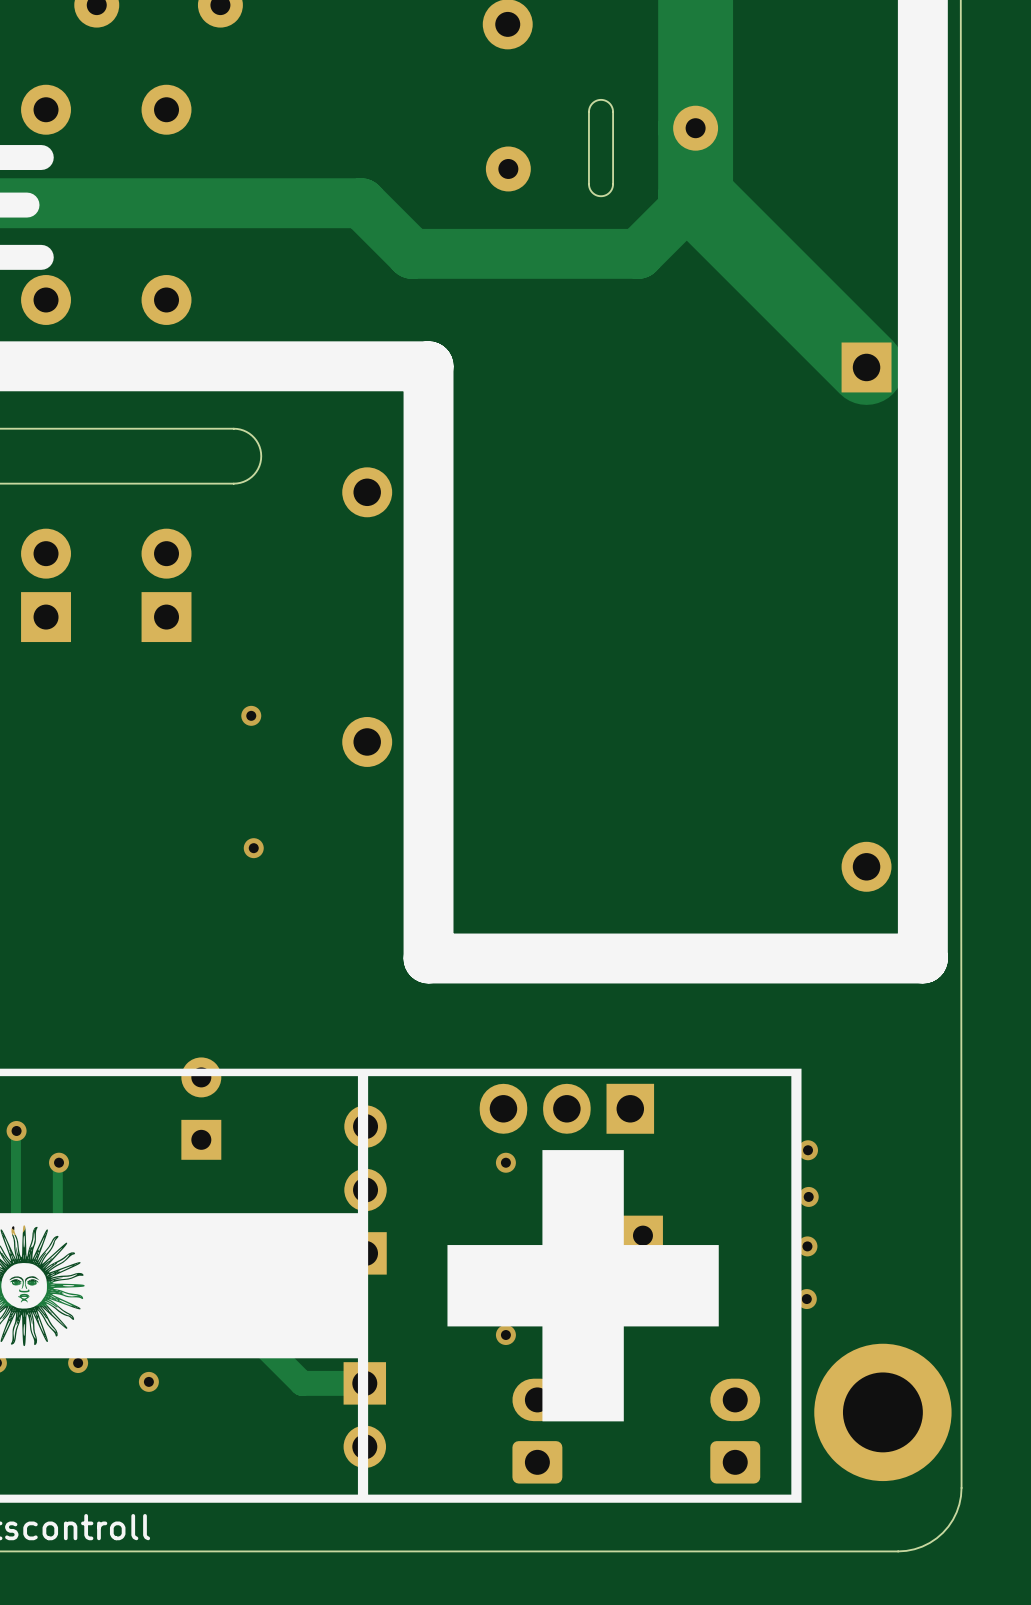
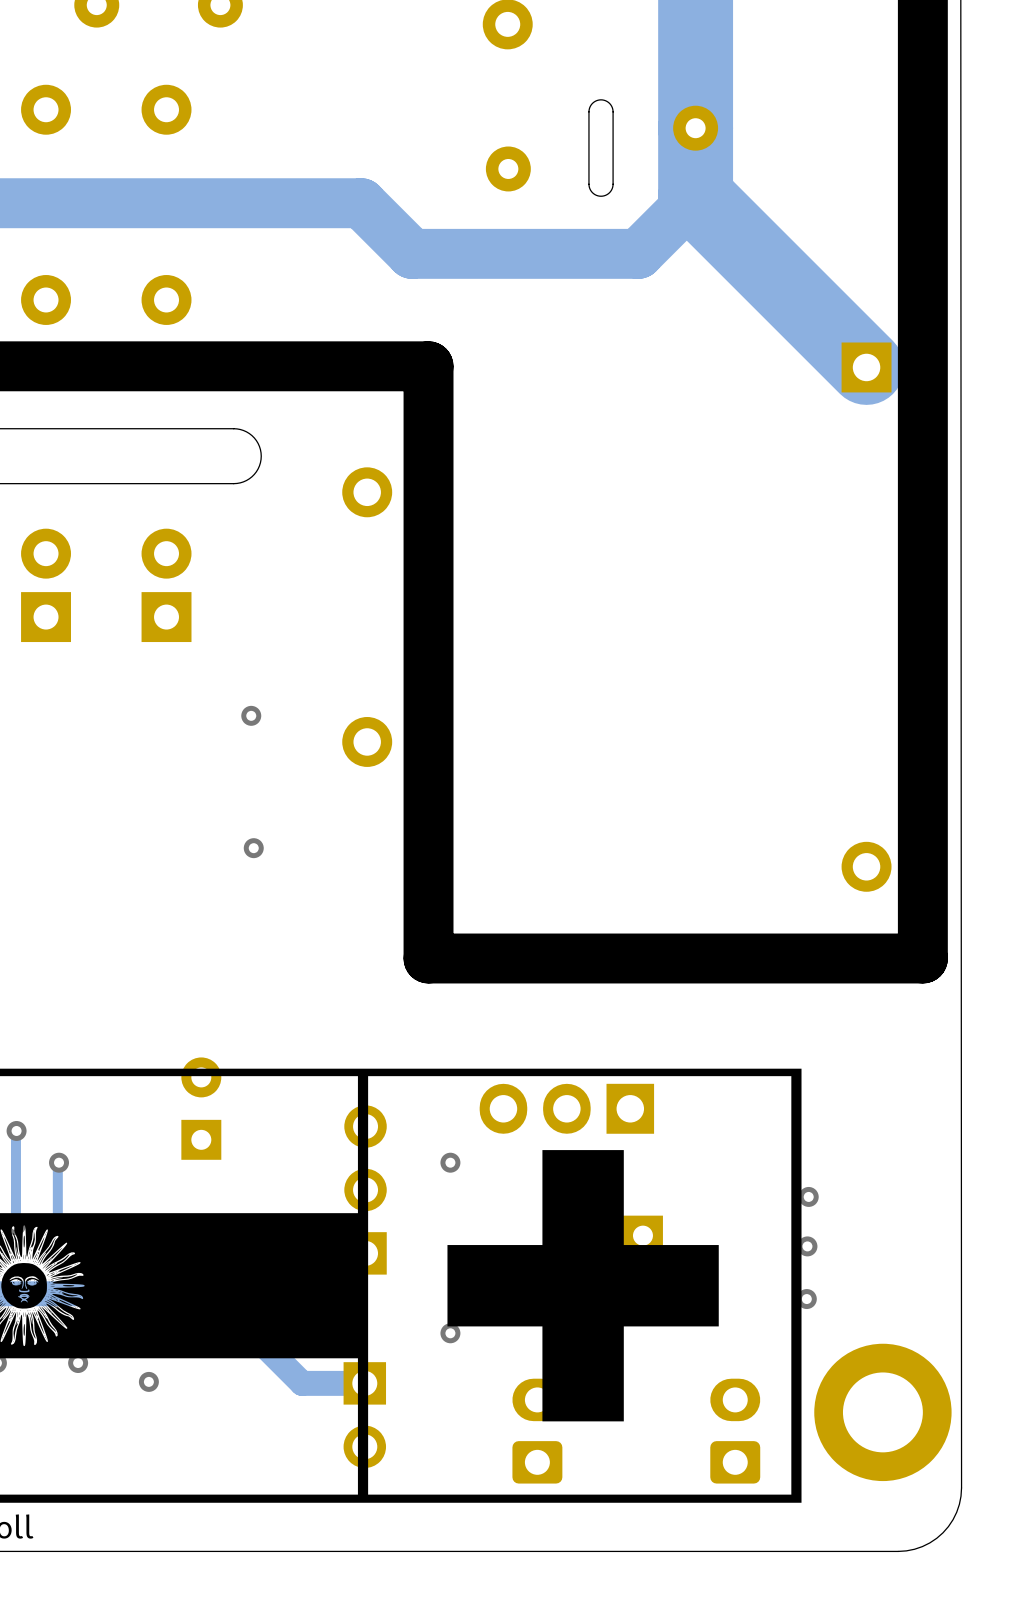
via: (808, 1150) -> none
via position: (505, 1162) -> (450, 1162)
via position: (505, 1335) -> (450, 1333)

